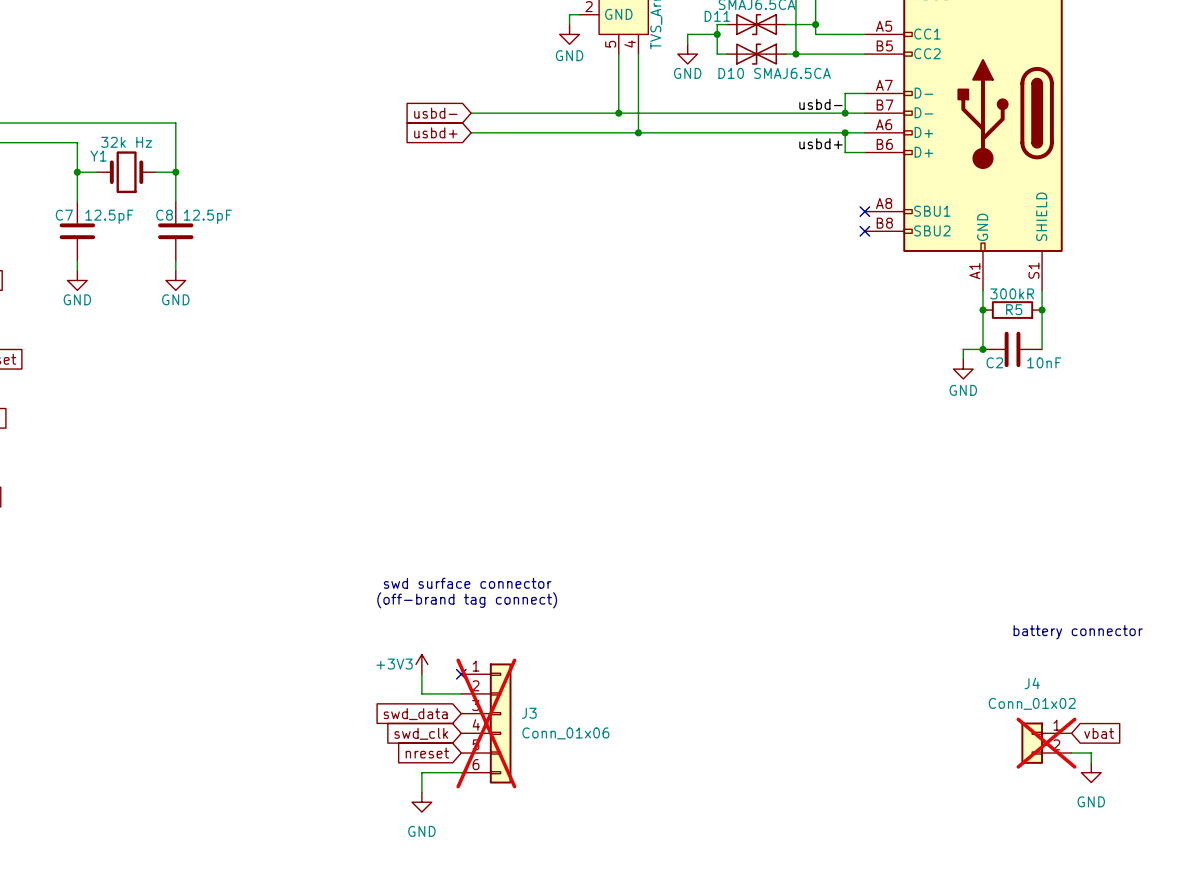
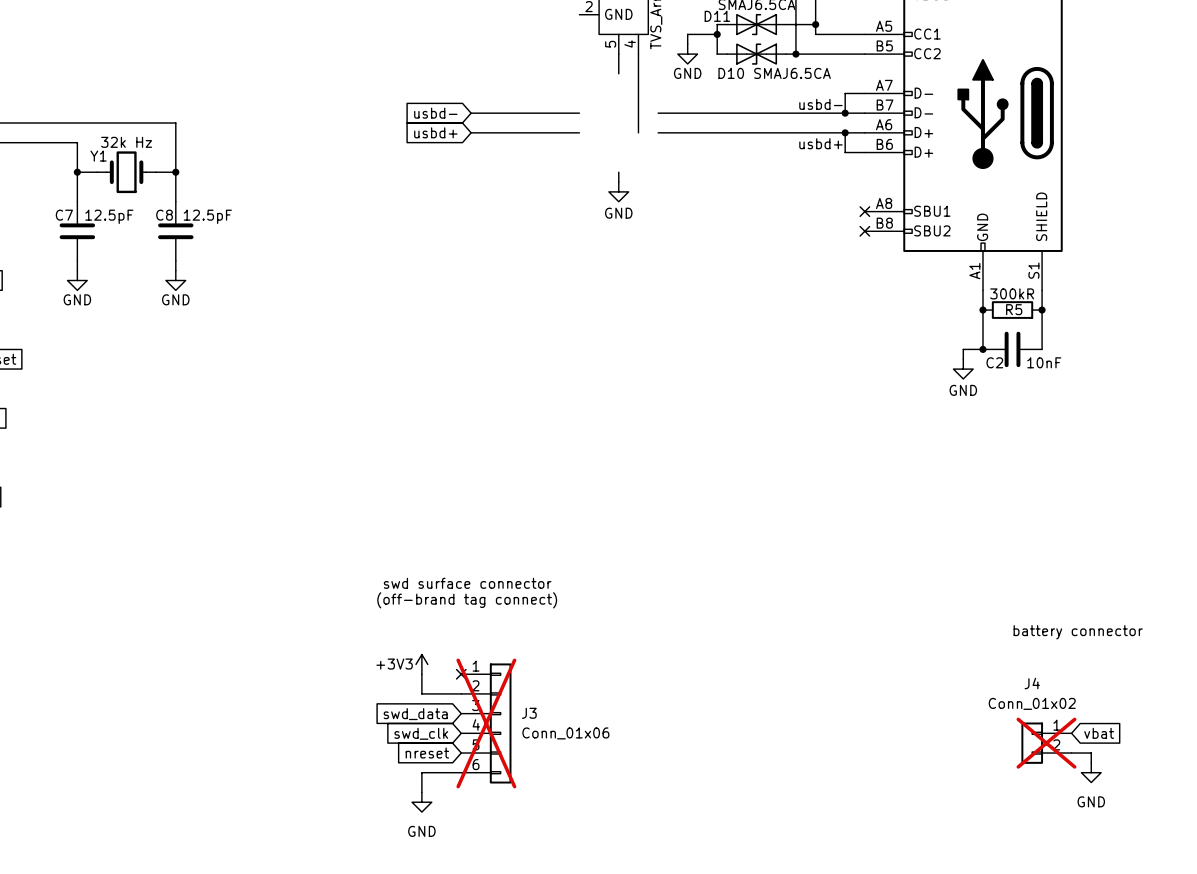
wire: (579, 14) (569, 14) (569, 24) -> none
power symbol: GND (569, 34) -> none
wire: (618, 73) (618, 113) -> none
wire: (579, 113) (658, 113) -> none
junction: (618, 113) -> none
wire: (579, 132) (658, 132) -> none
junction: (638, 132) -> none
wire: none -> (618, 172) (618, 182)
power symbol: none -> GND (618, 191)

